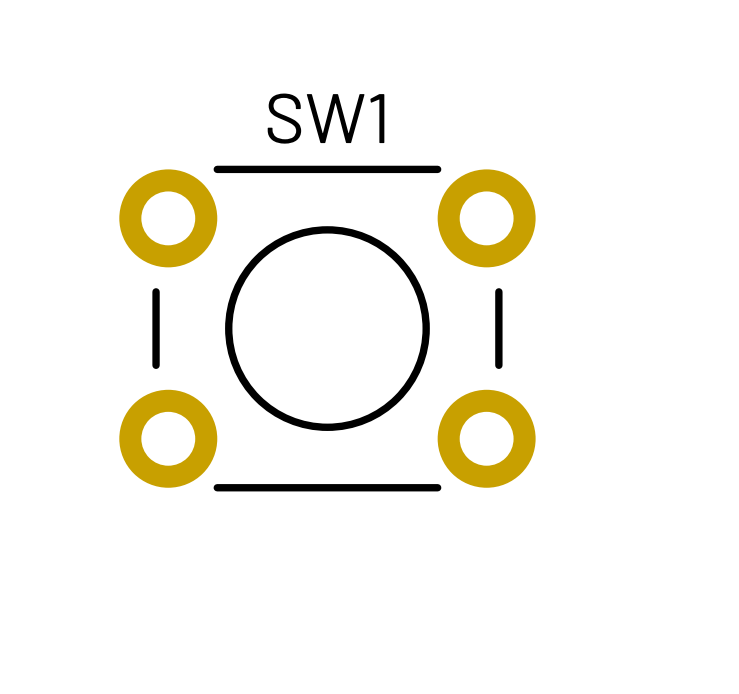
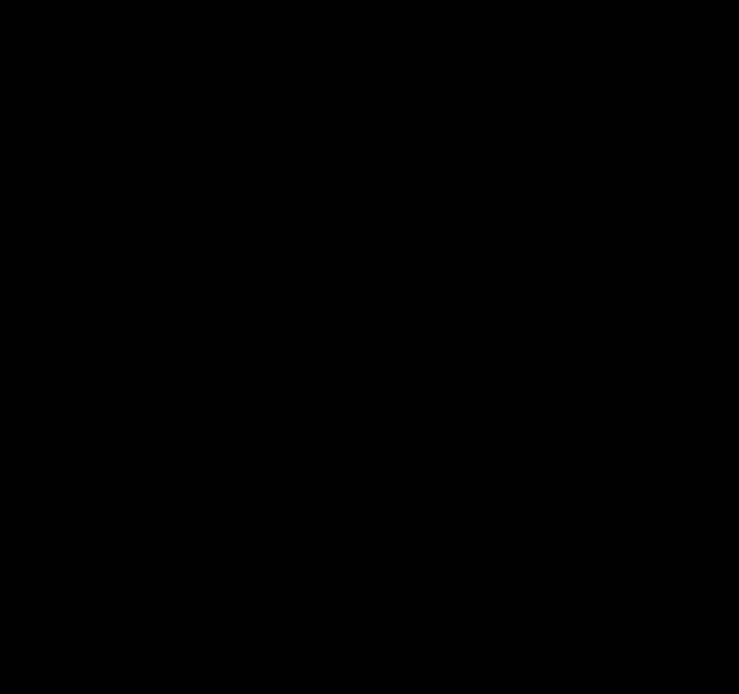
SW1: (327, 328) -> none

